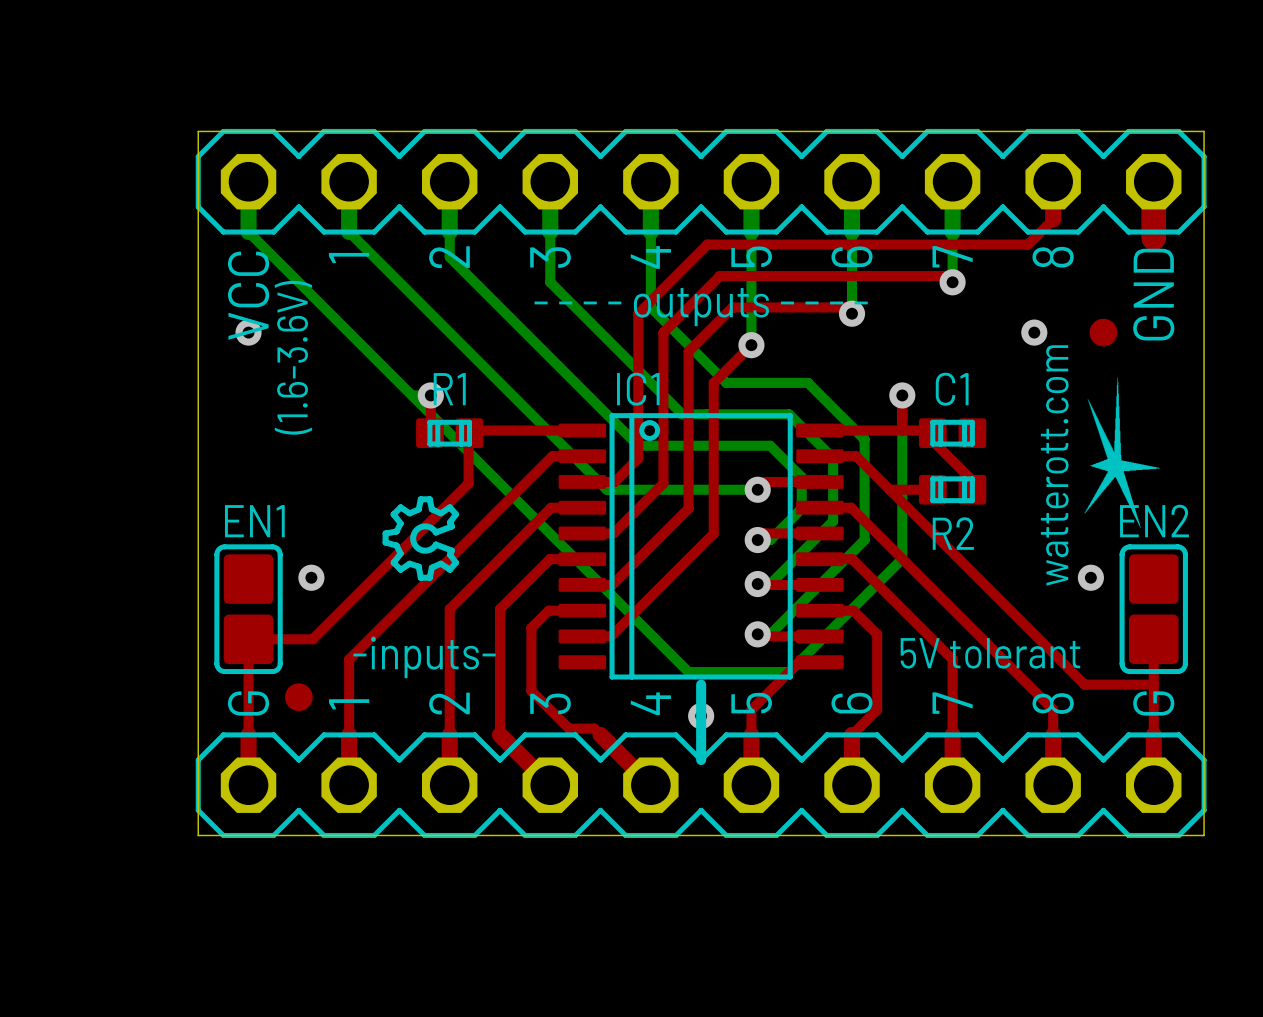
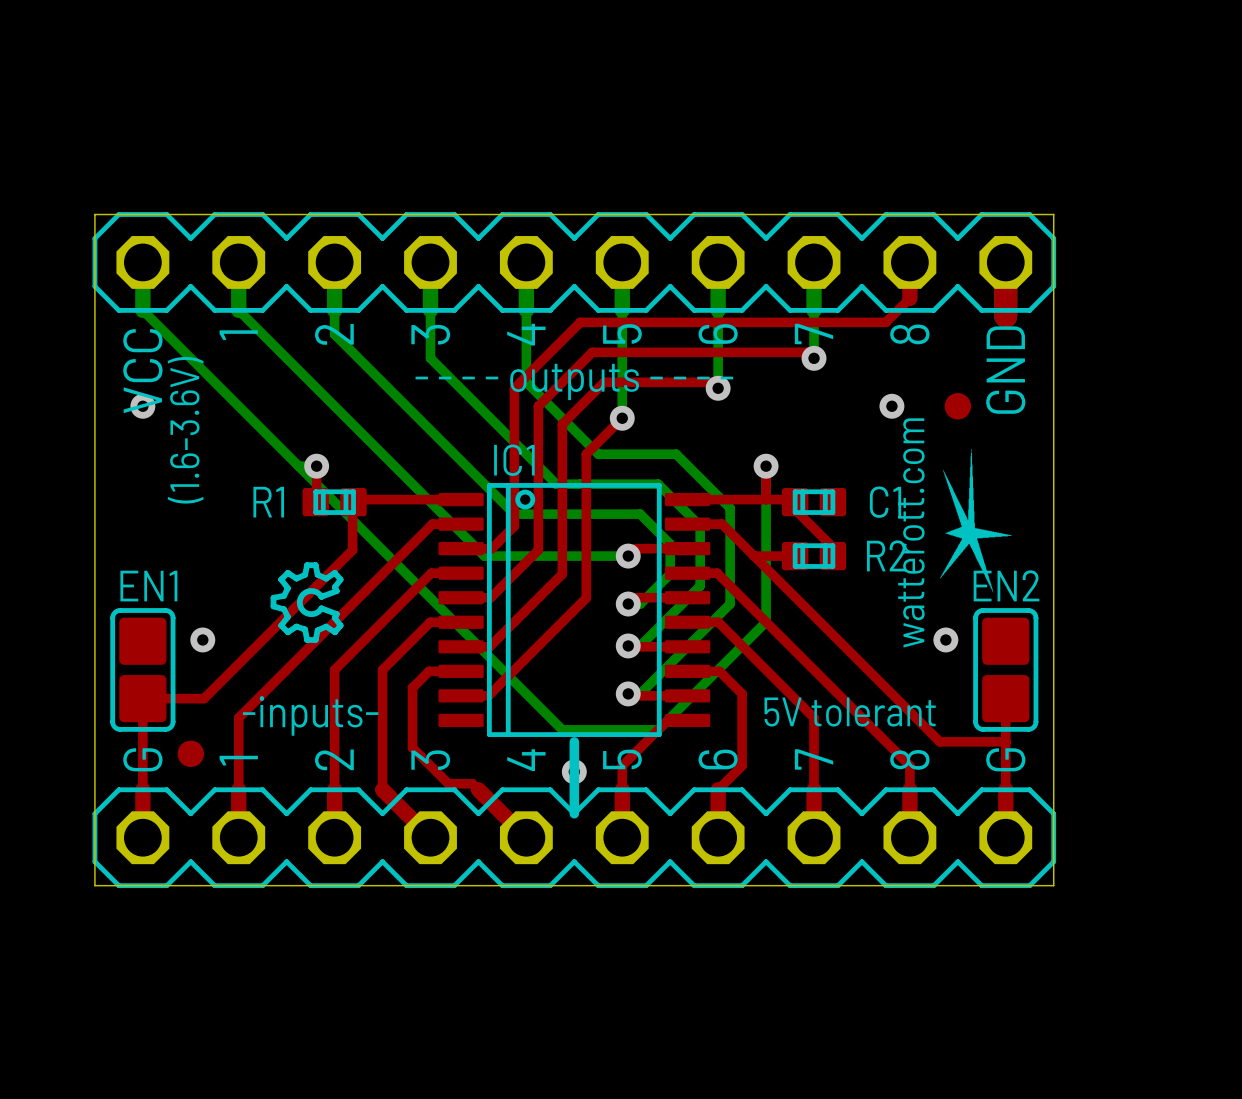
R1 name position: R1 (449, 389) -> R1 (268, 502)
C1 name position: C1 (952, 389) -> C1 (885, 502)
R2 name position: R2 (953, 533) -> R2 (886, 555)

